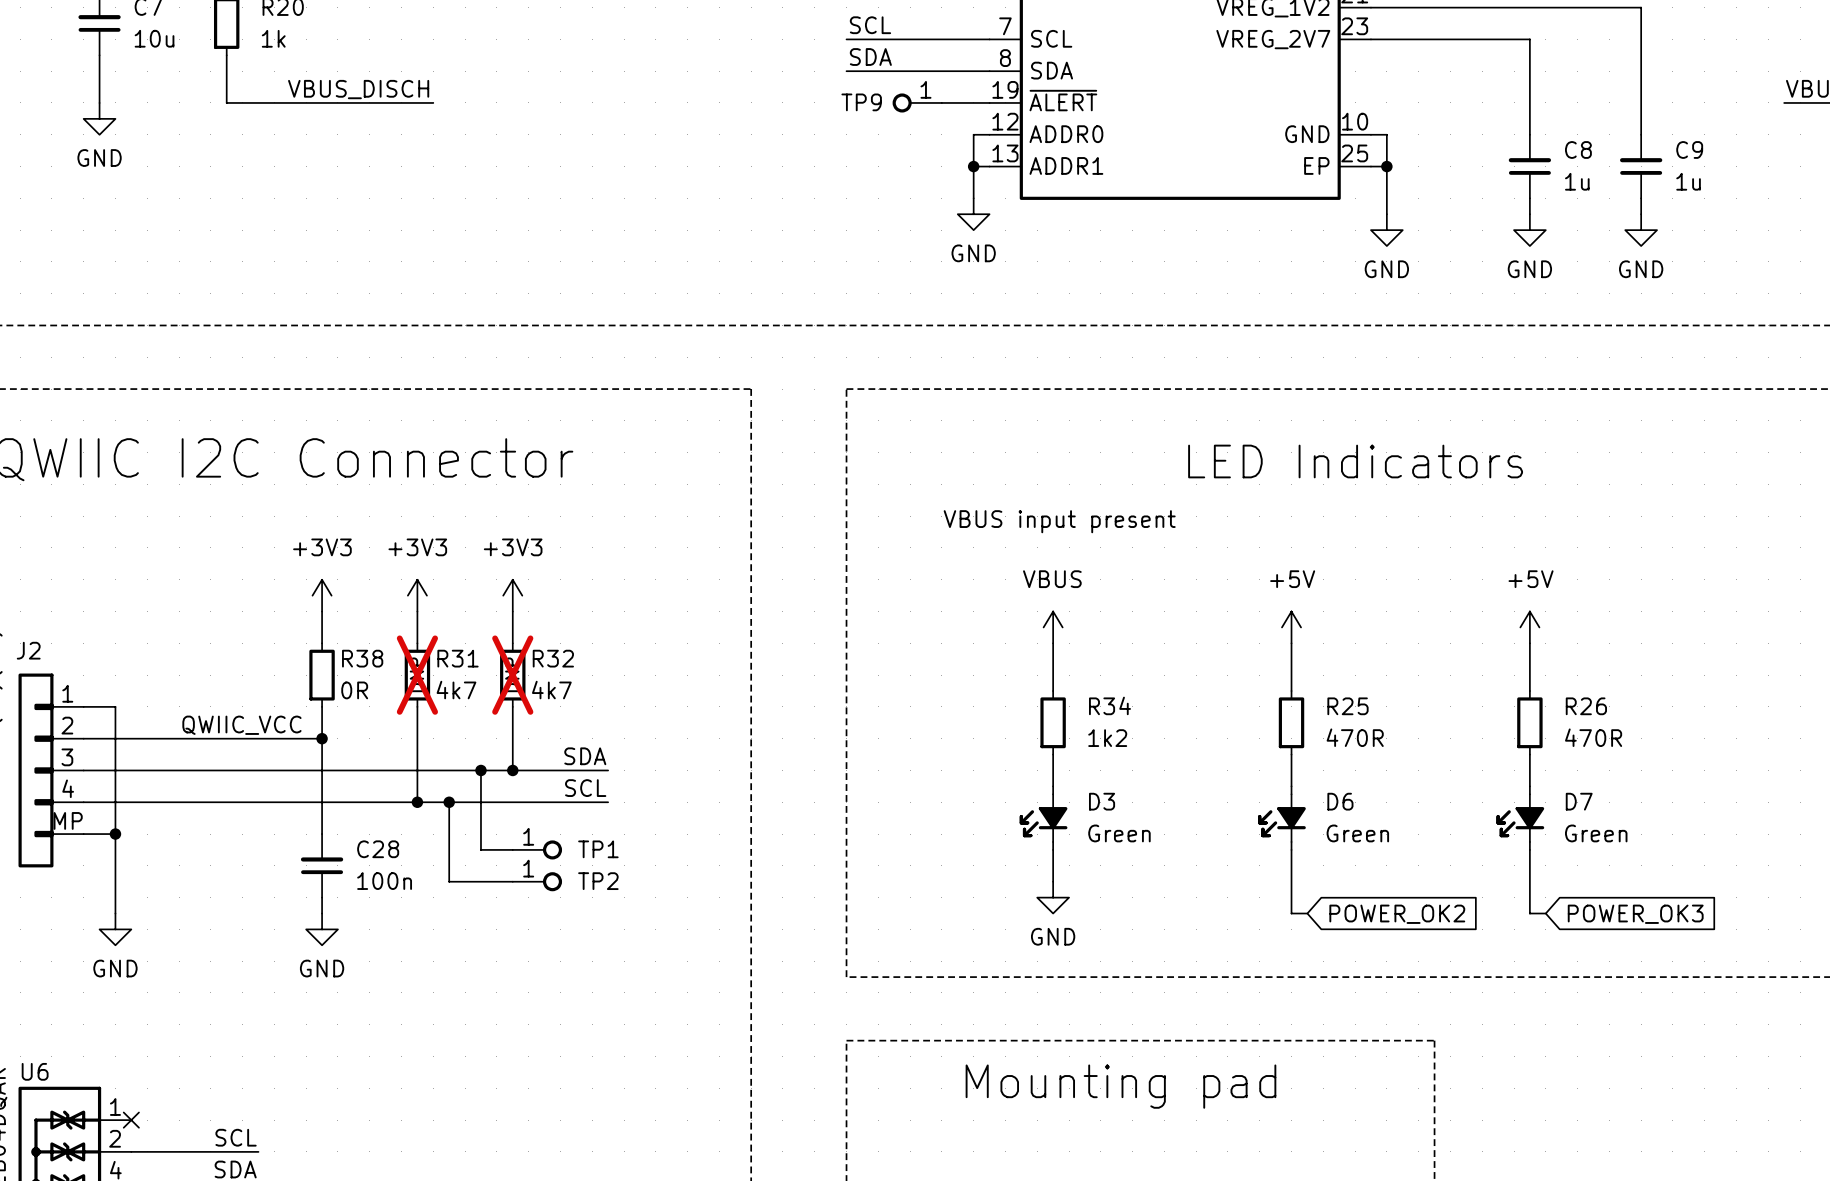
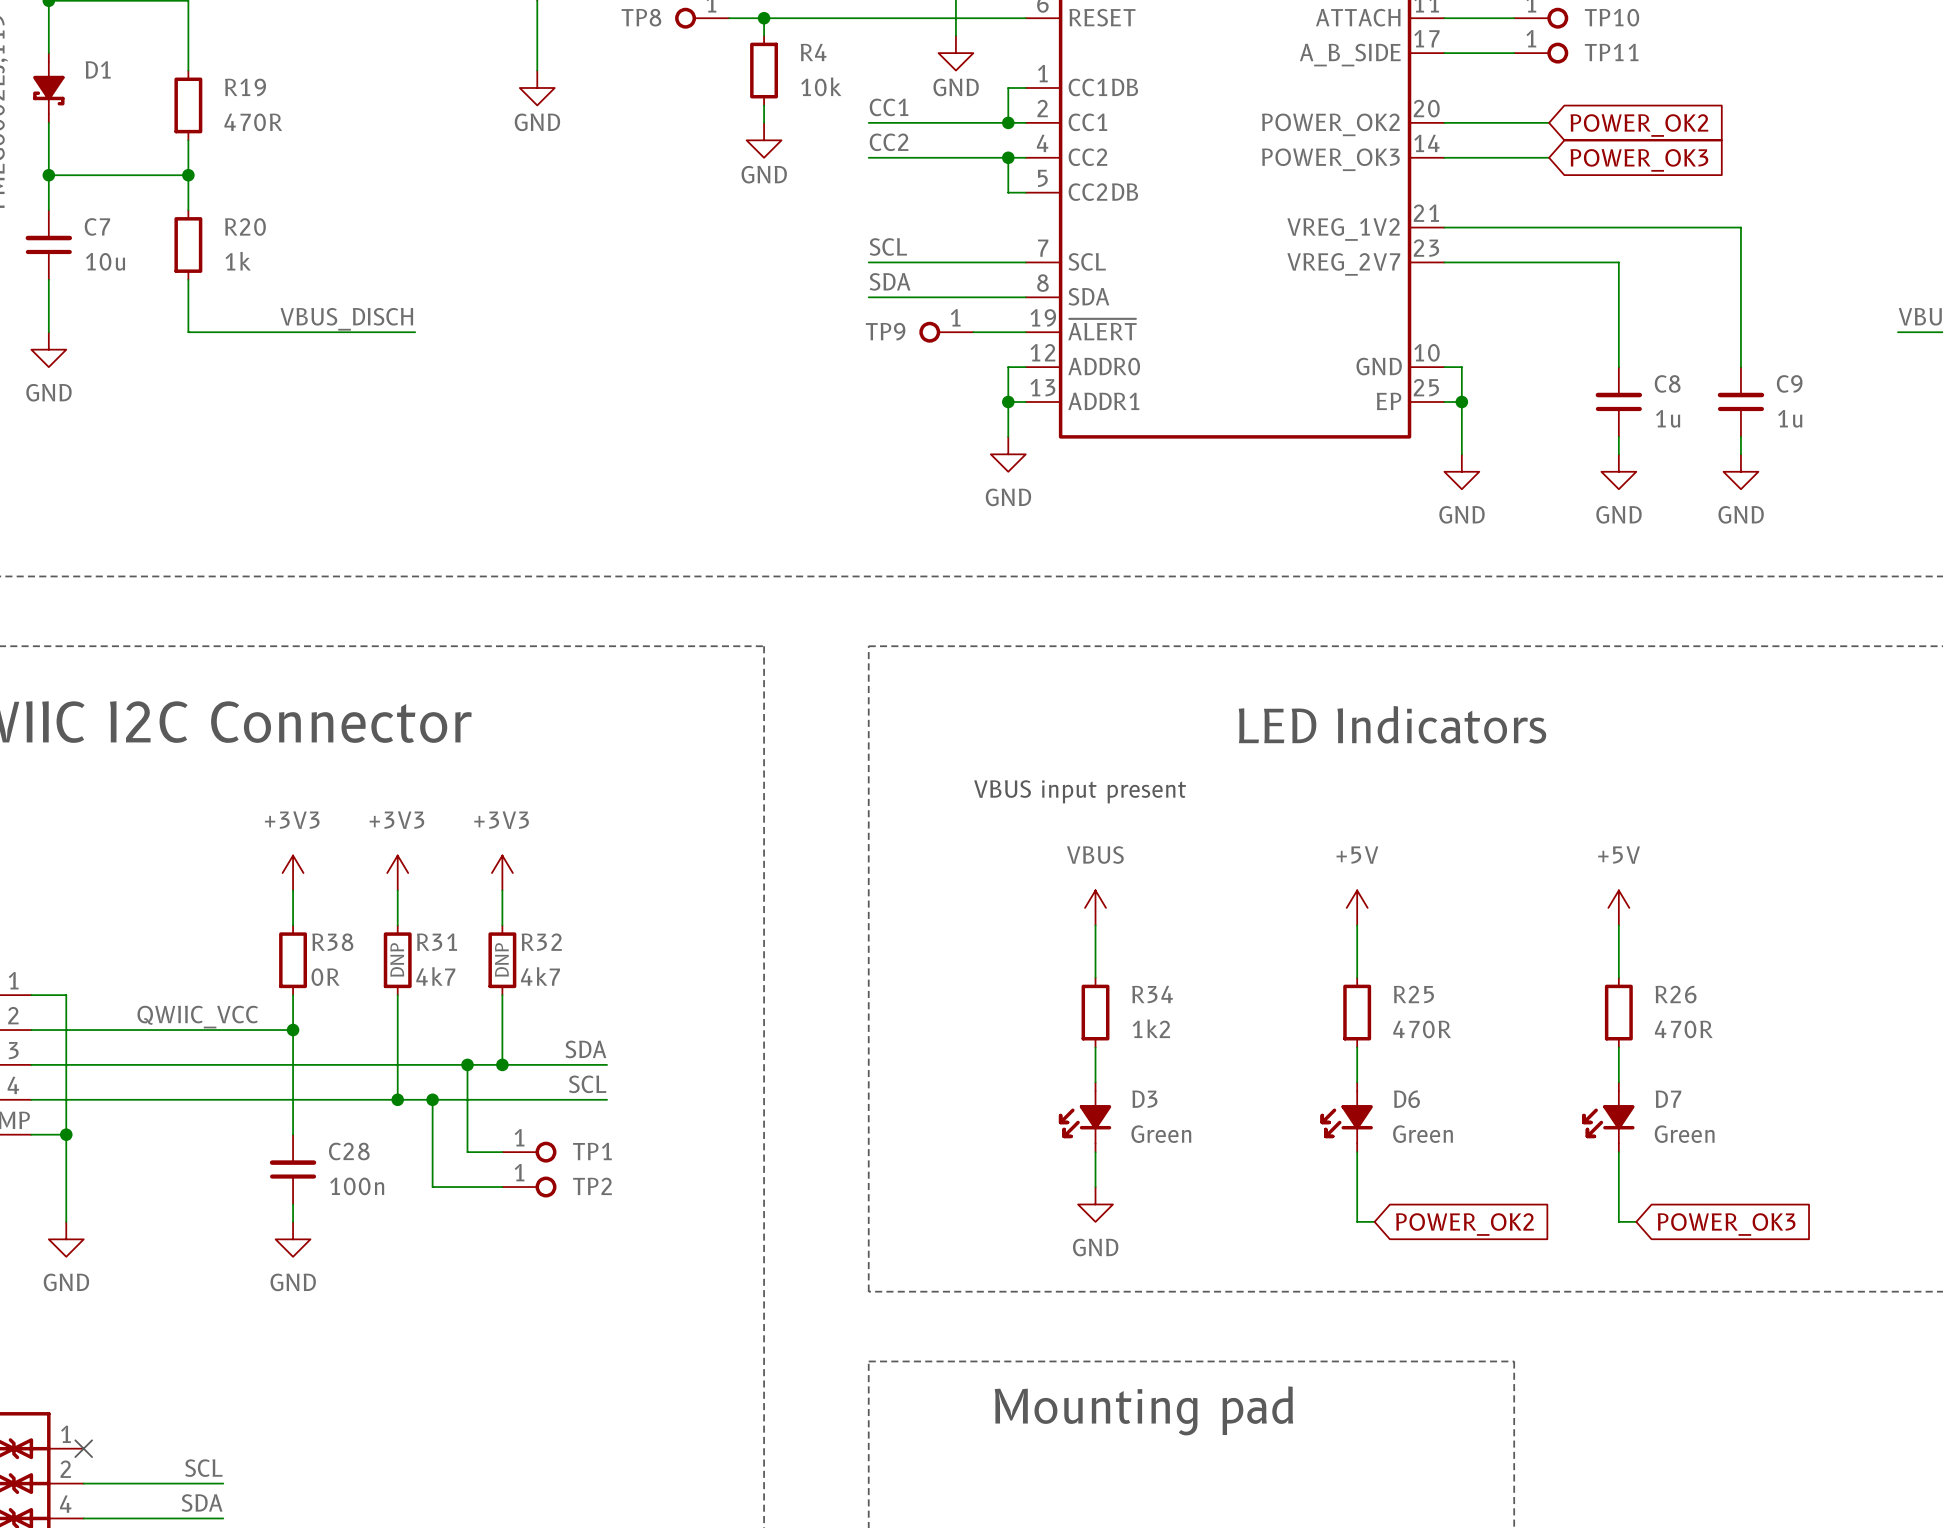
R31 do-not-place cross: (417, 675) -> none
R32 do-not-place cross: (512, 675) -> none

